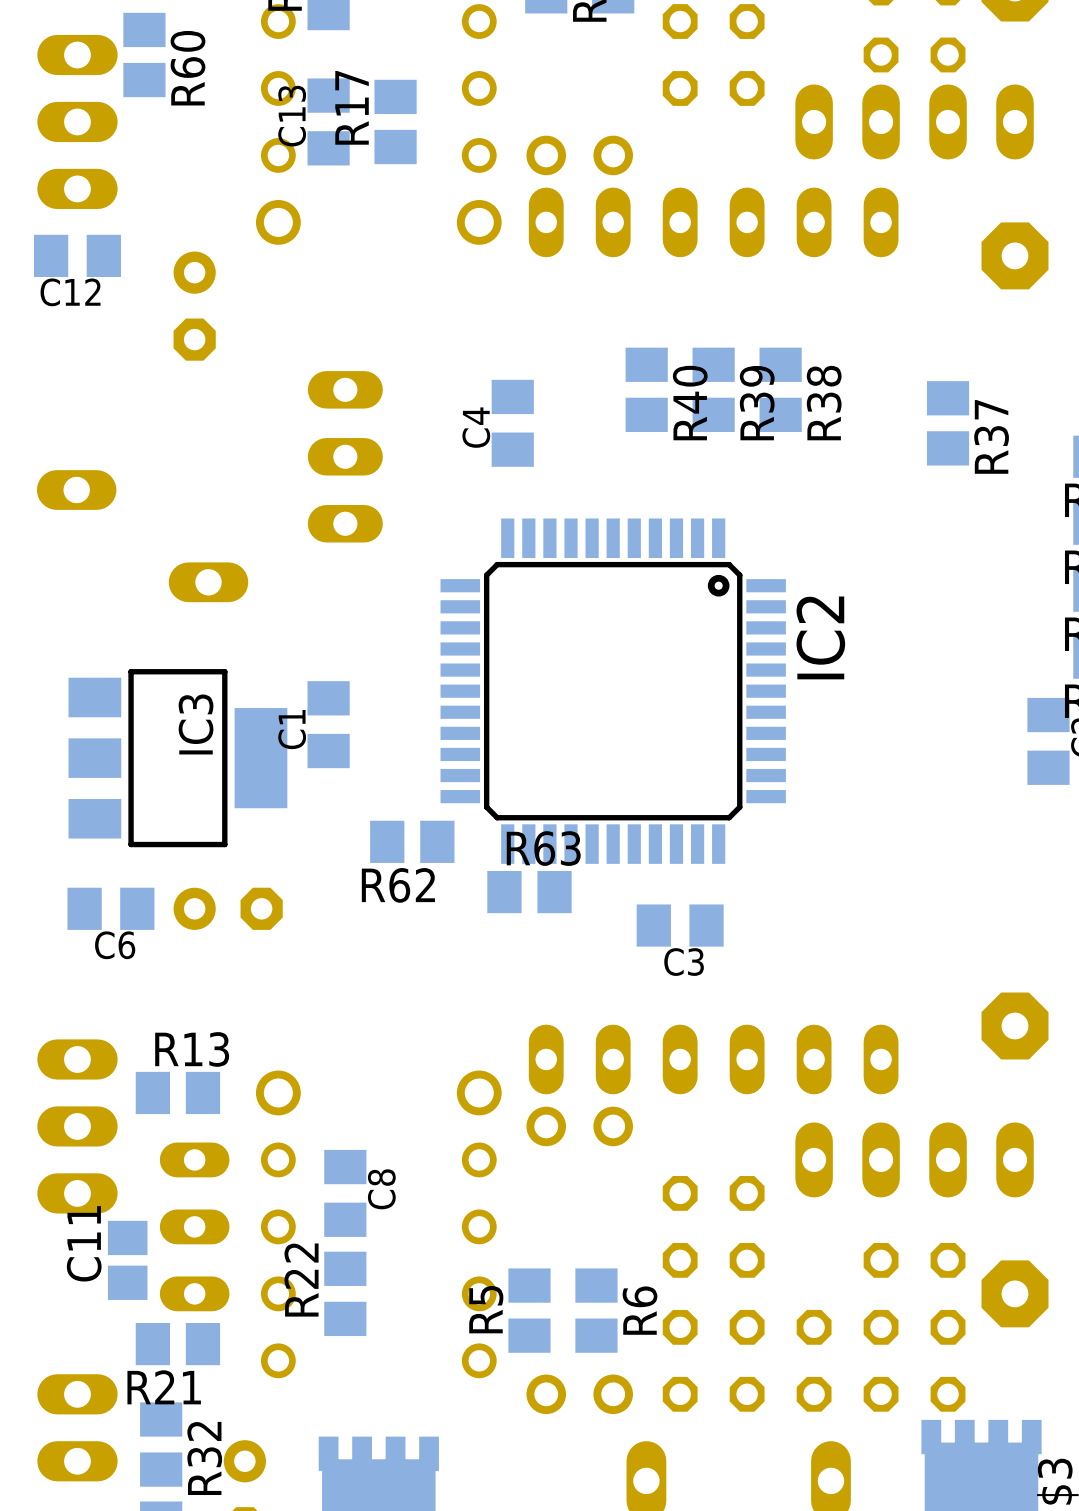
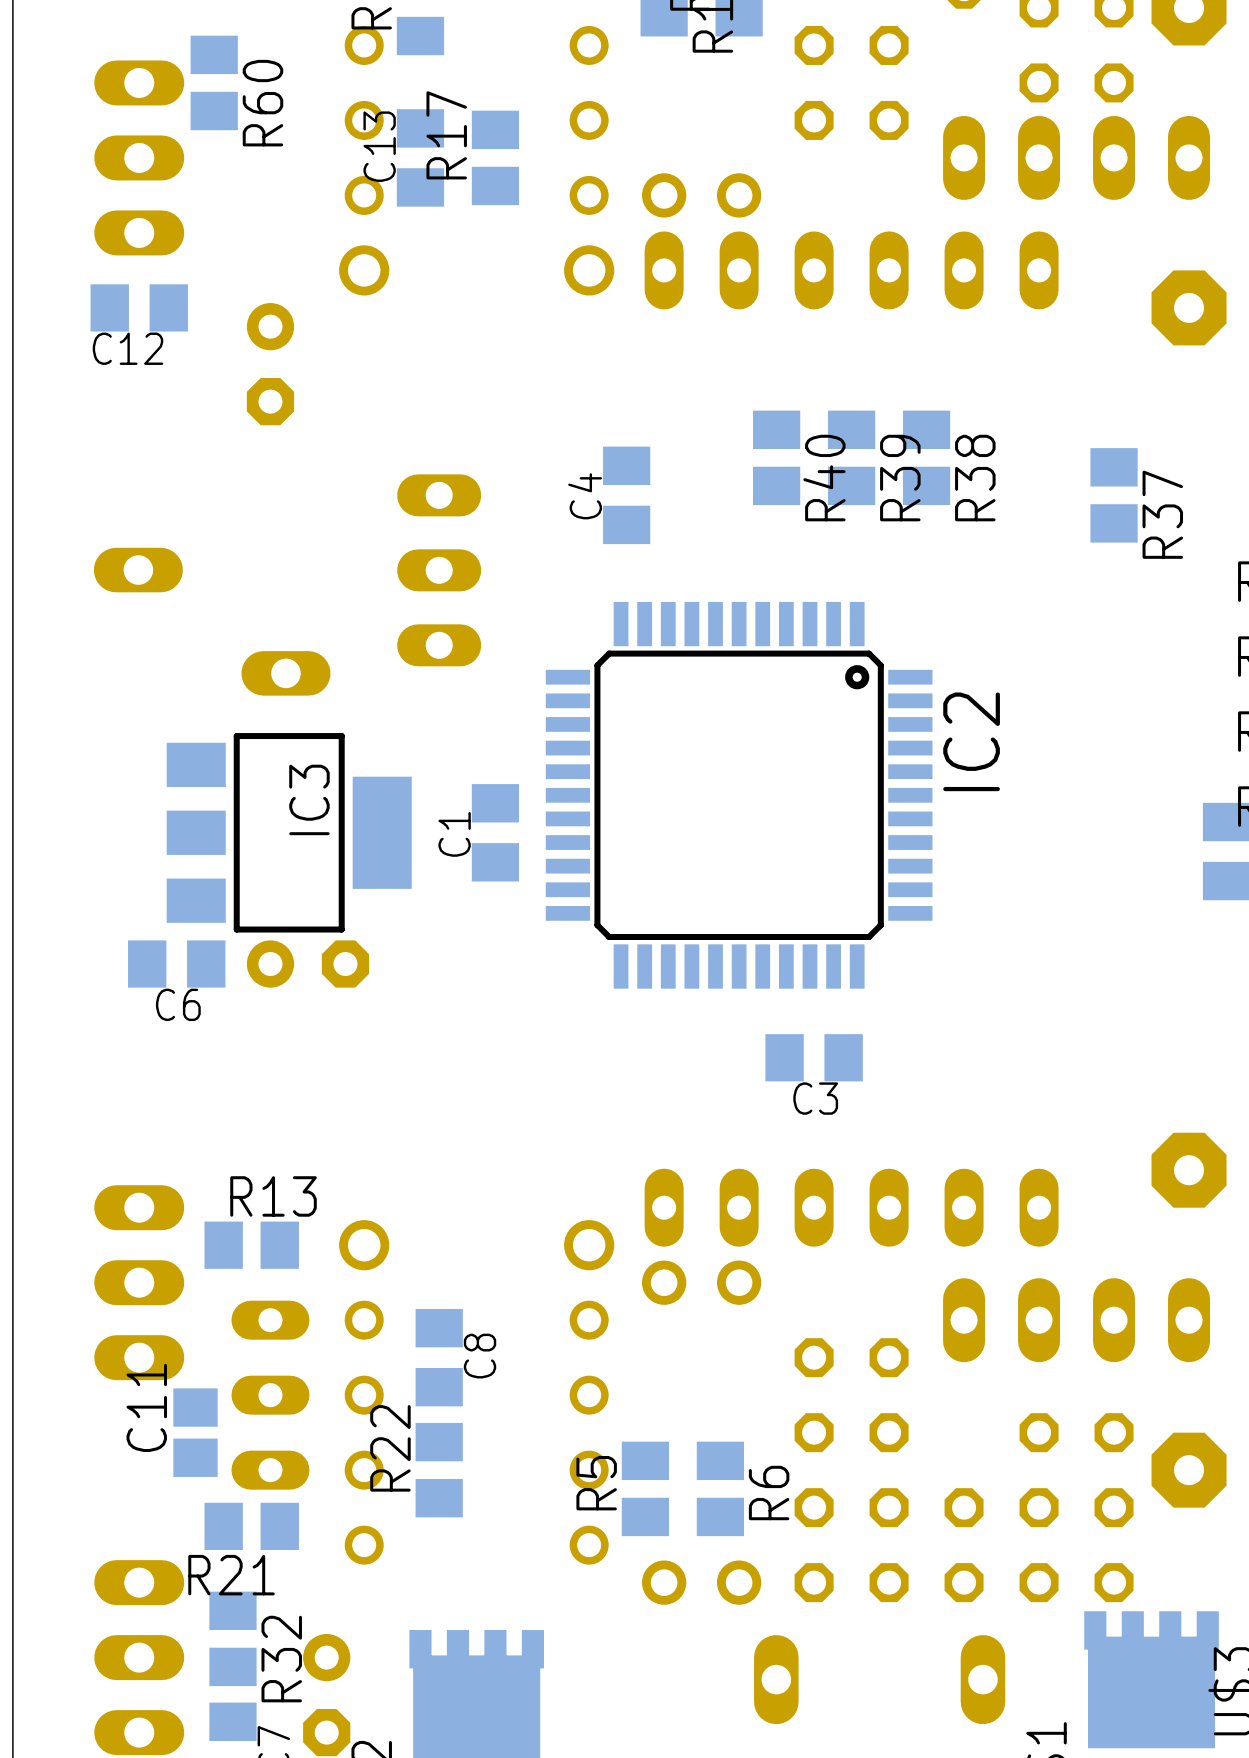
part position: (345, 456) -> (439, 570)
C1 position: (328, 724) -> (495, 832)
IC3 position: (177, 758) -> (289, 832)
R62: (412, 841) -> none
R63: (529, 892) -> none
C6 position: (110, 908) -> (176, 964)
part position: (228, 908) -> (307, 964)

